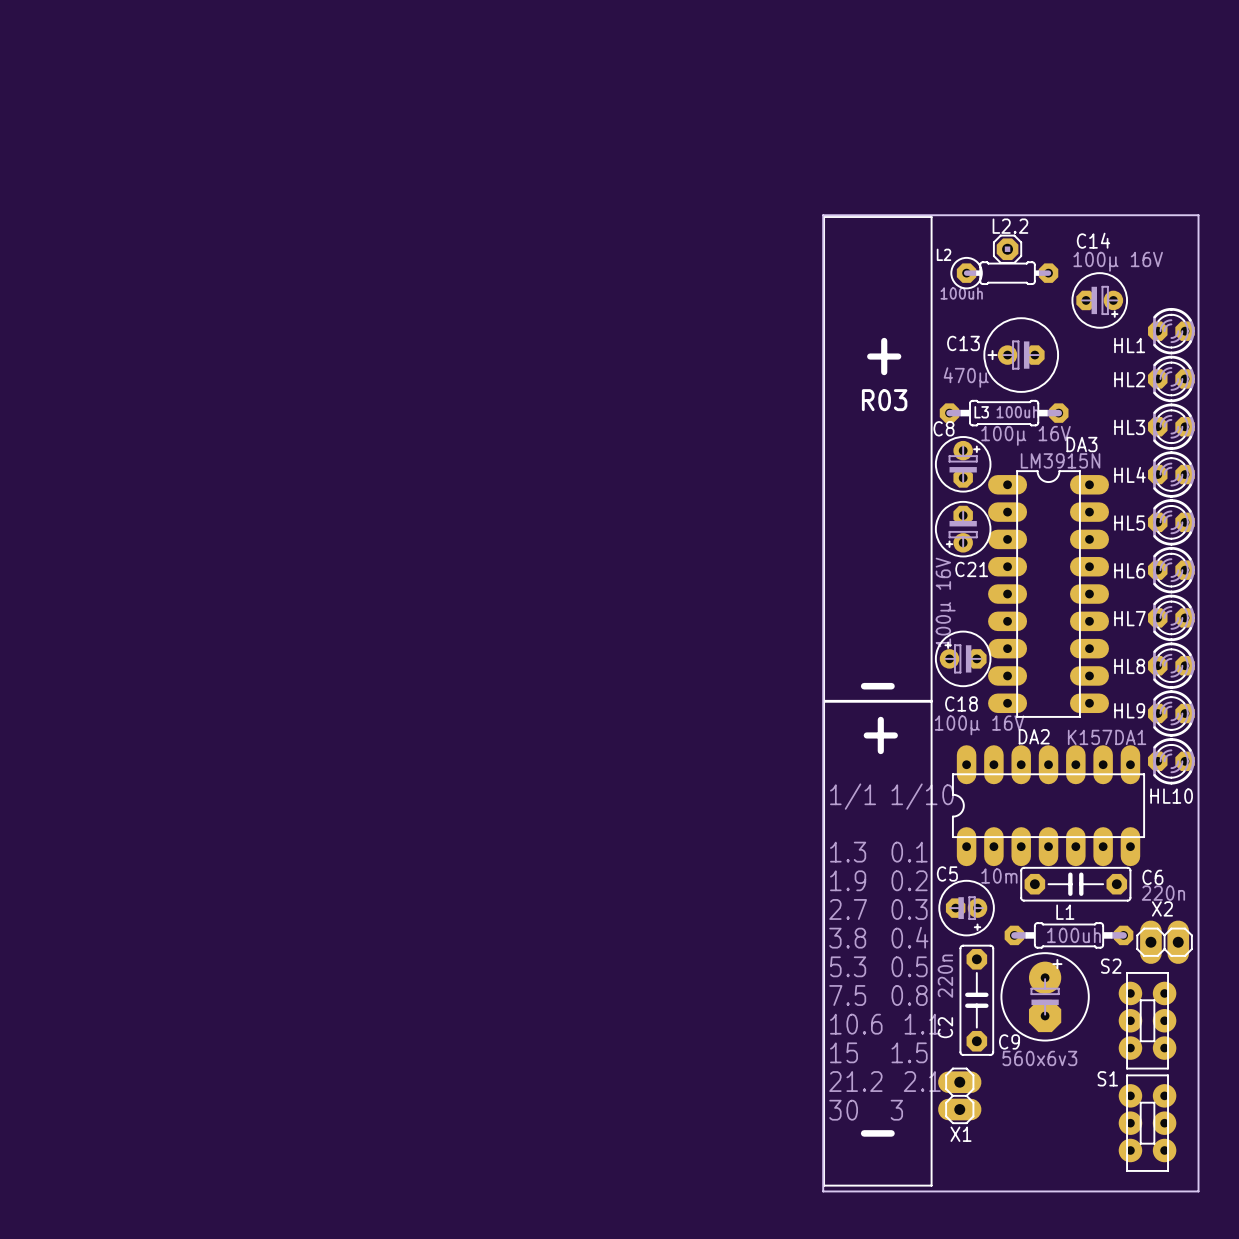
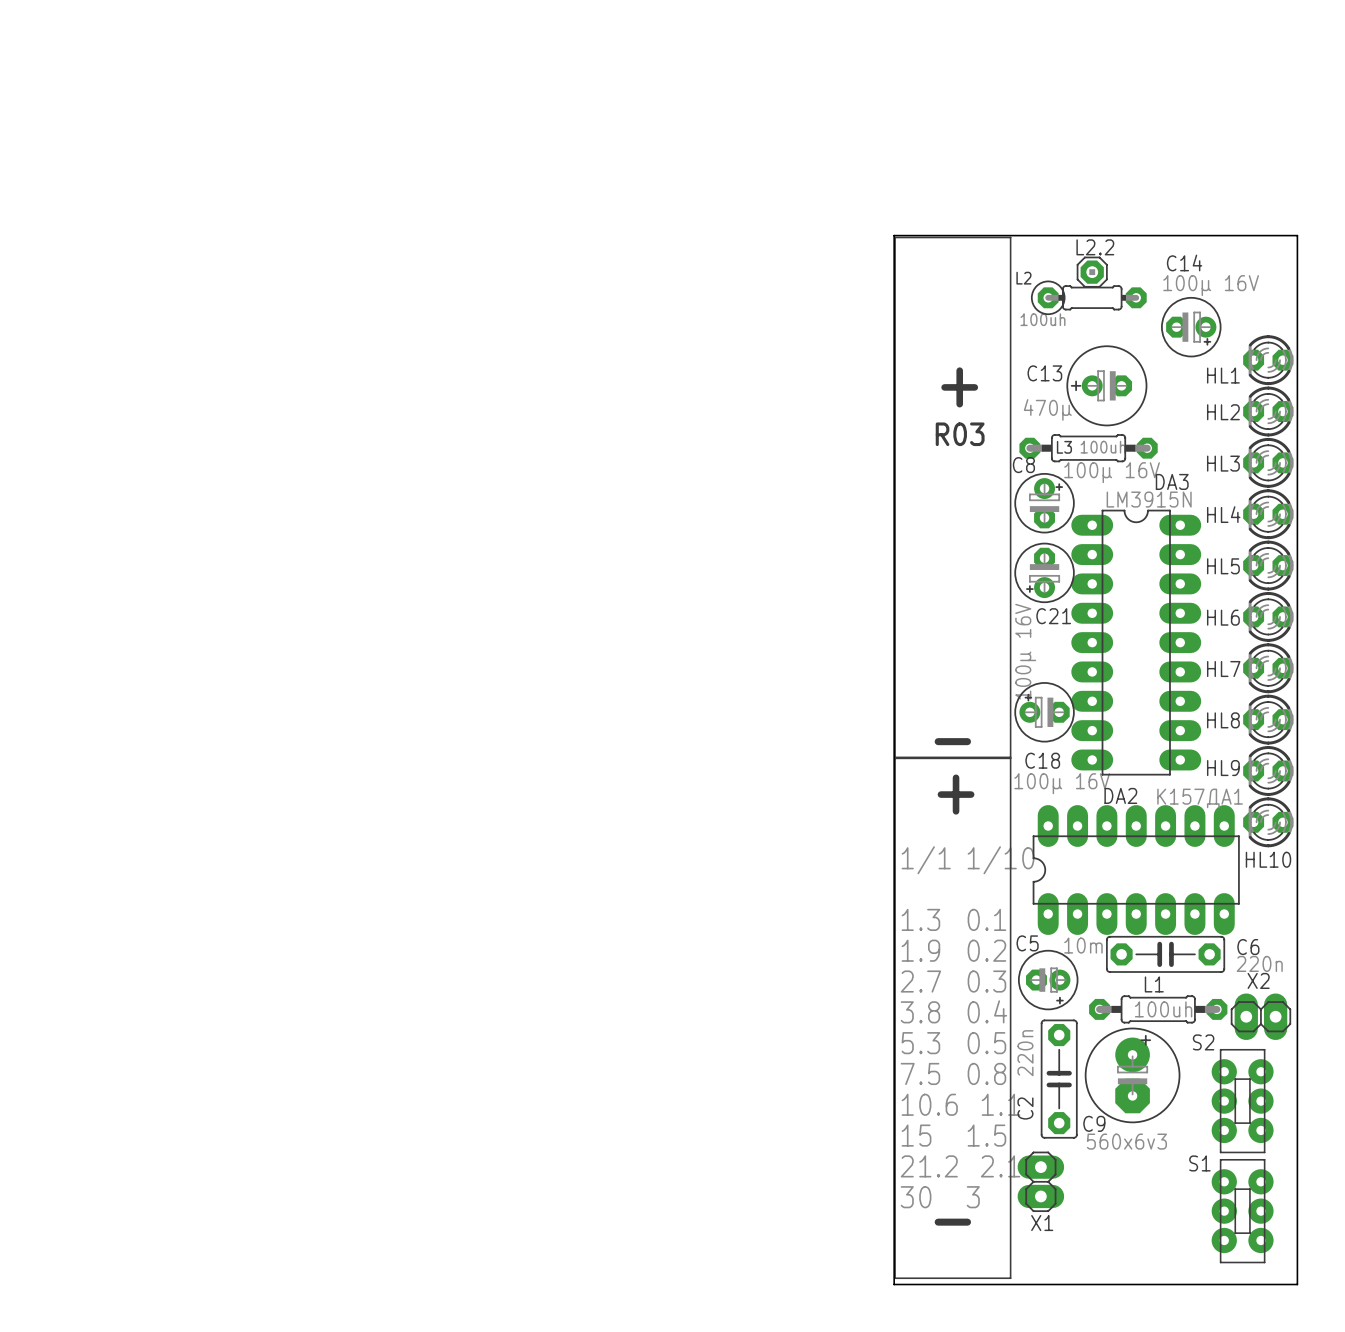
DA2 value: K157DA1 (1107, 737) -> К157ДА1 (1200, 798)

